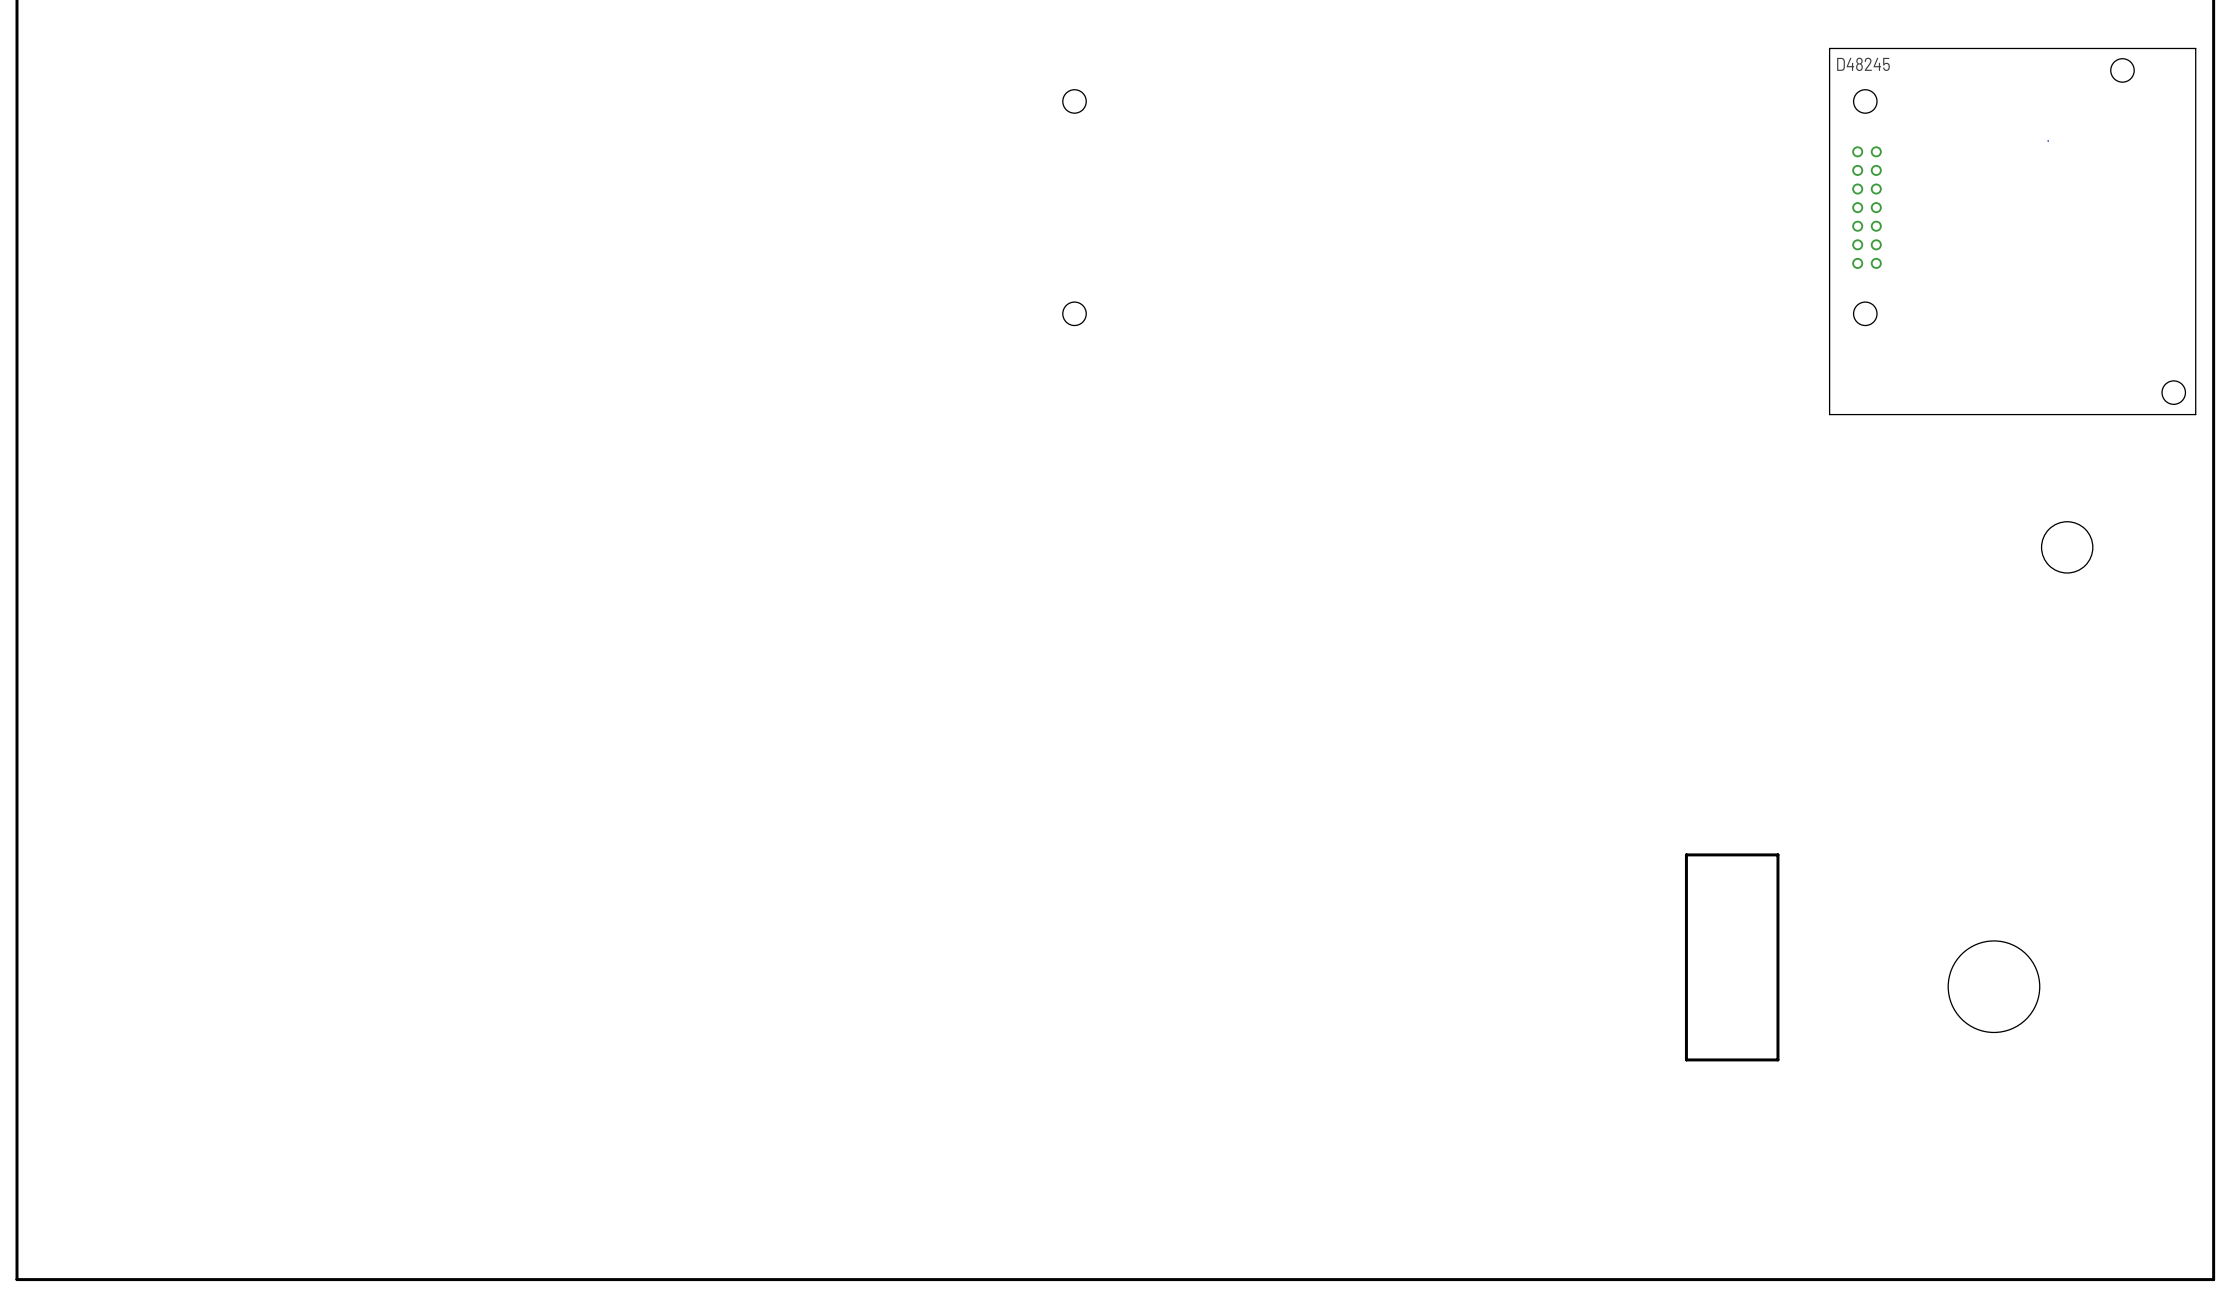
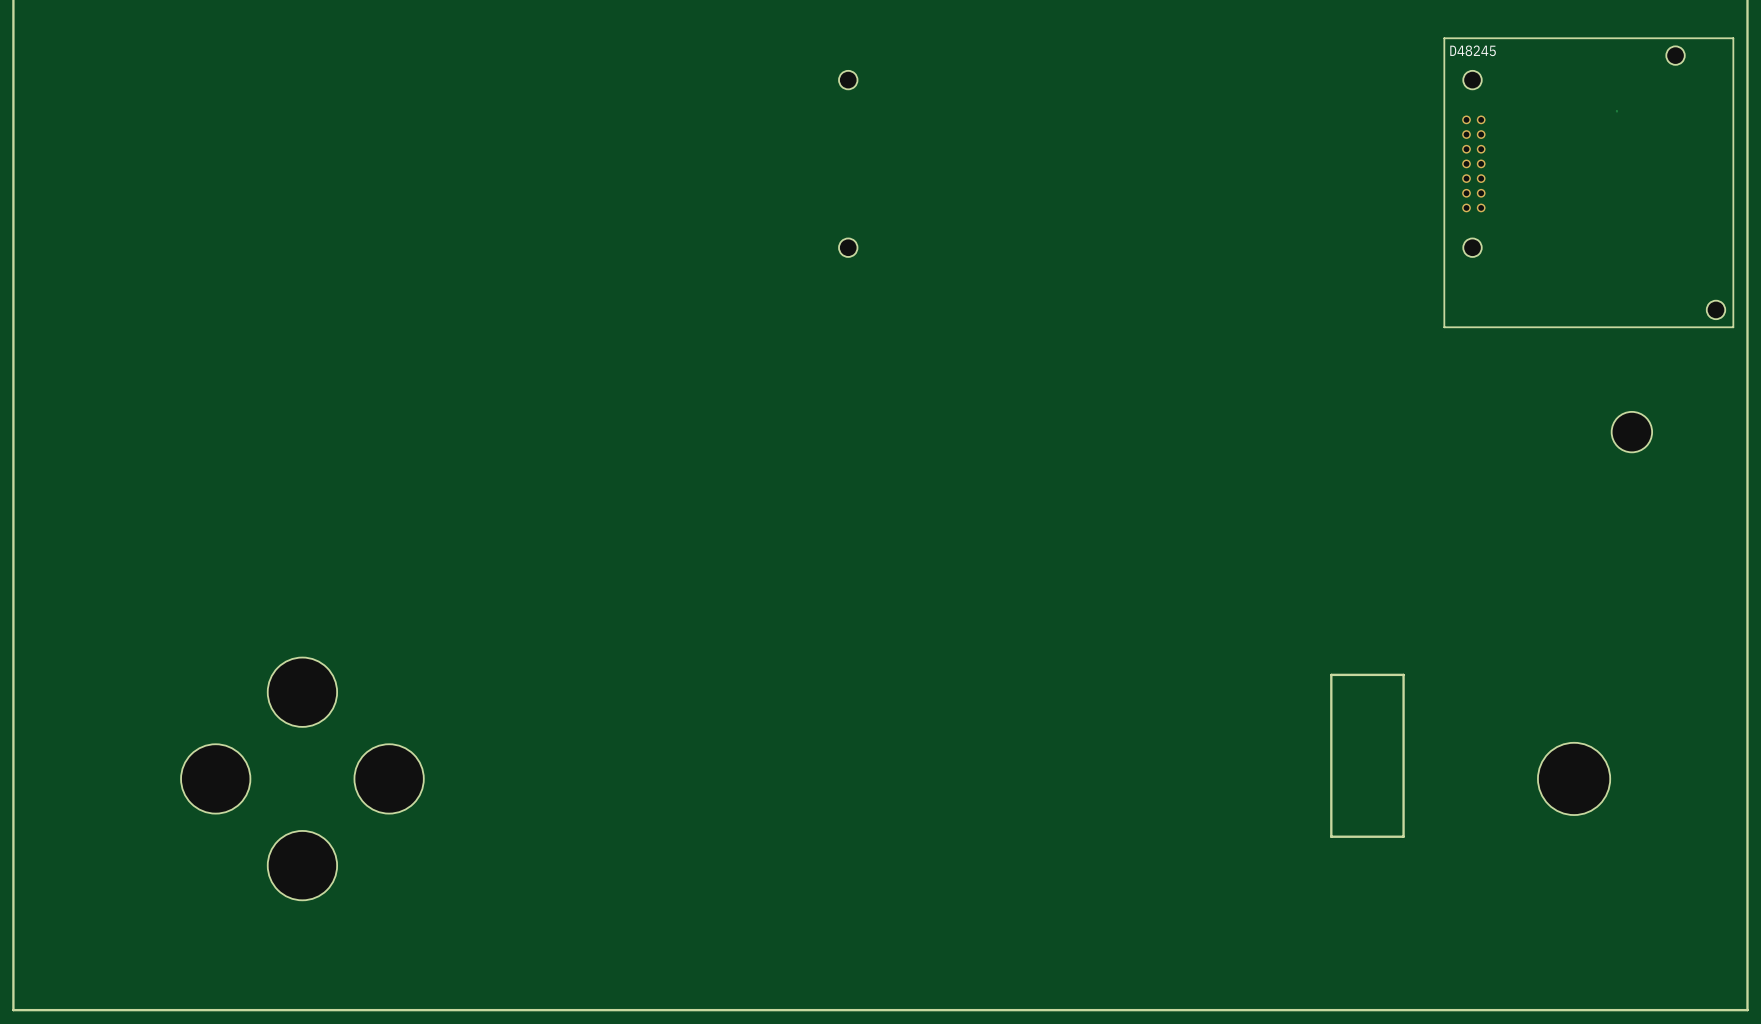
hole: none -> (302, 692)
hole: none -> (215, 778)
hole: none -> (389, 778)
hole: none -> (302, 865)

